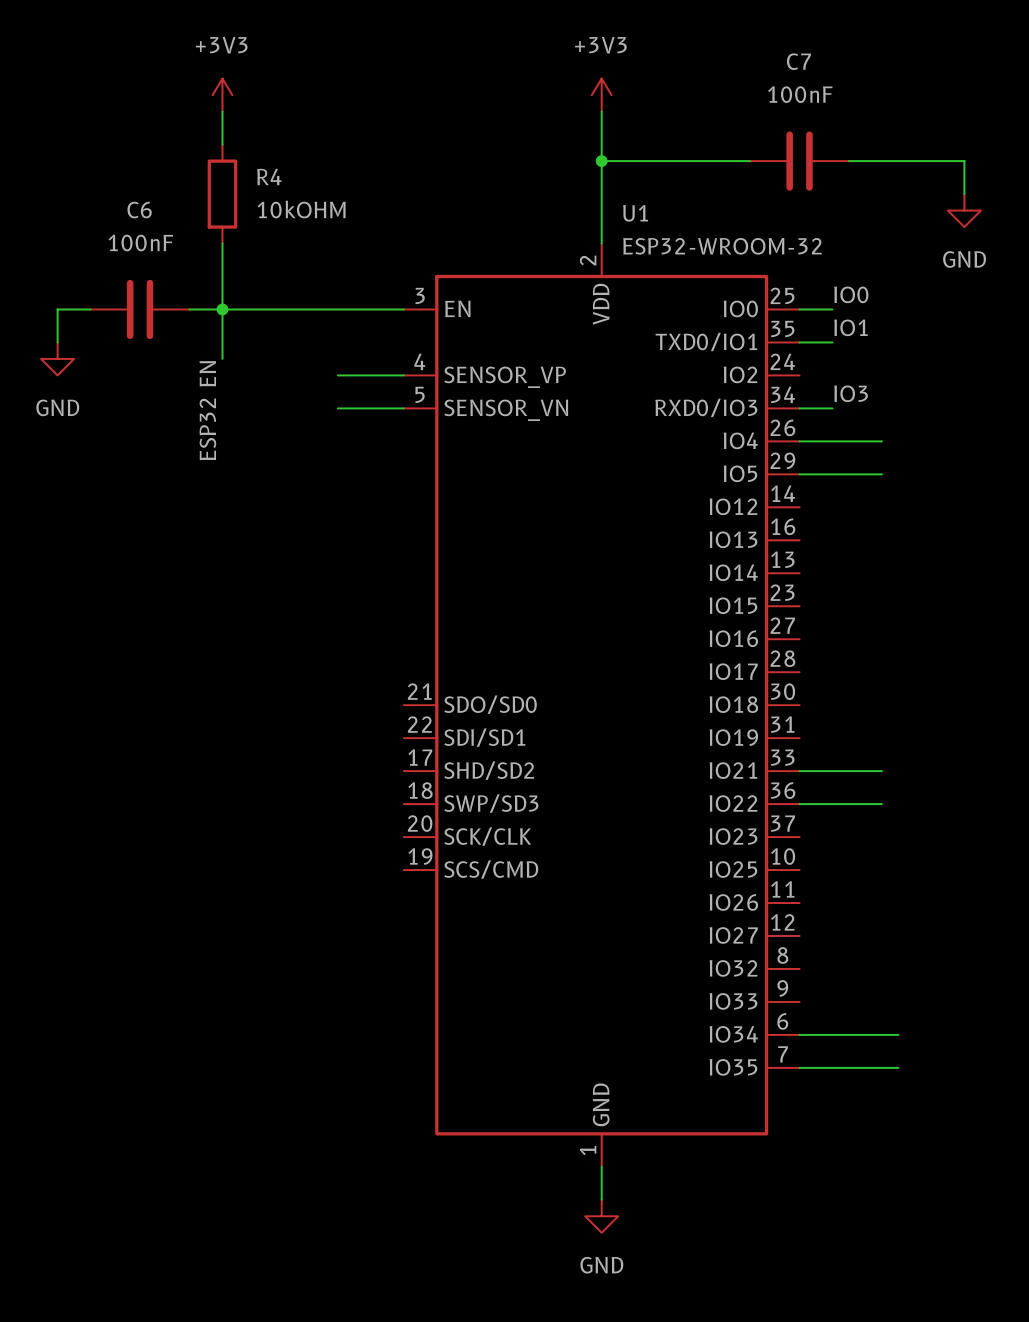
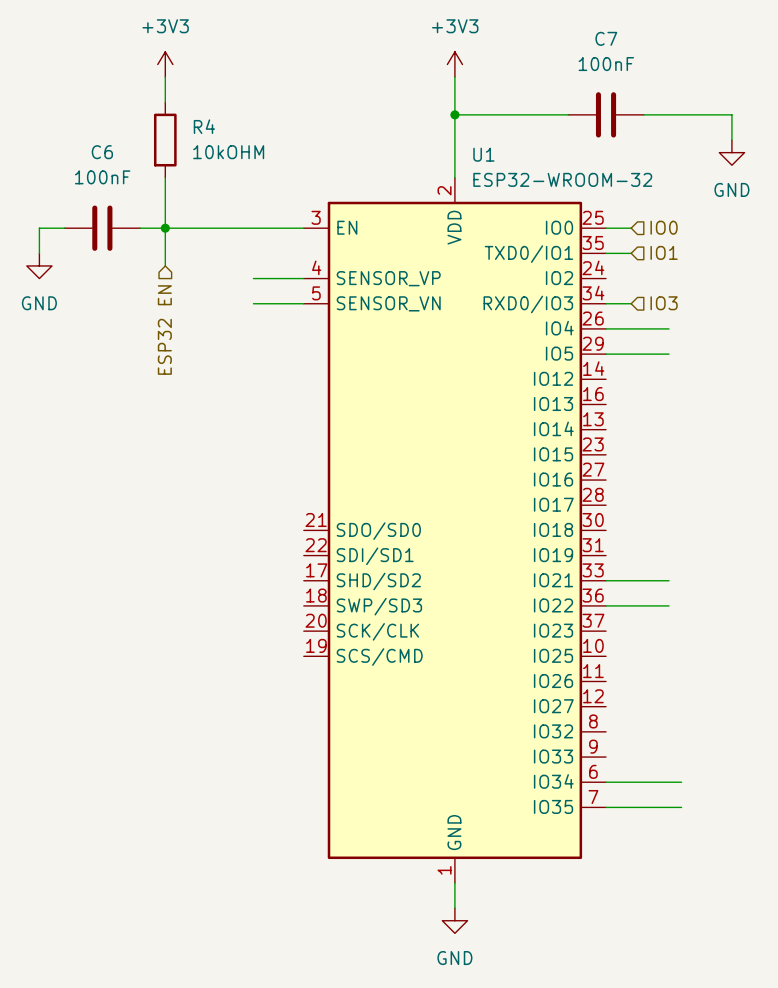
label: IO0 (851, 294) -> none
hierarchical label: none -> IO0 (664, 227)
label: IO1 (851, 327) -> none
hierarchical label: none -> IO1 (664, 252)
label: IO3 (851, 393) -> none
hierarchical label: none -> IO3 (664, 303)
label: ESP32 EN (207, 410) -> none
hierarchical label: none -> ESP32 EN (164, 330)

